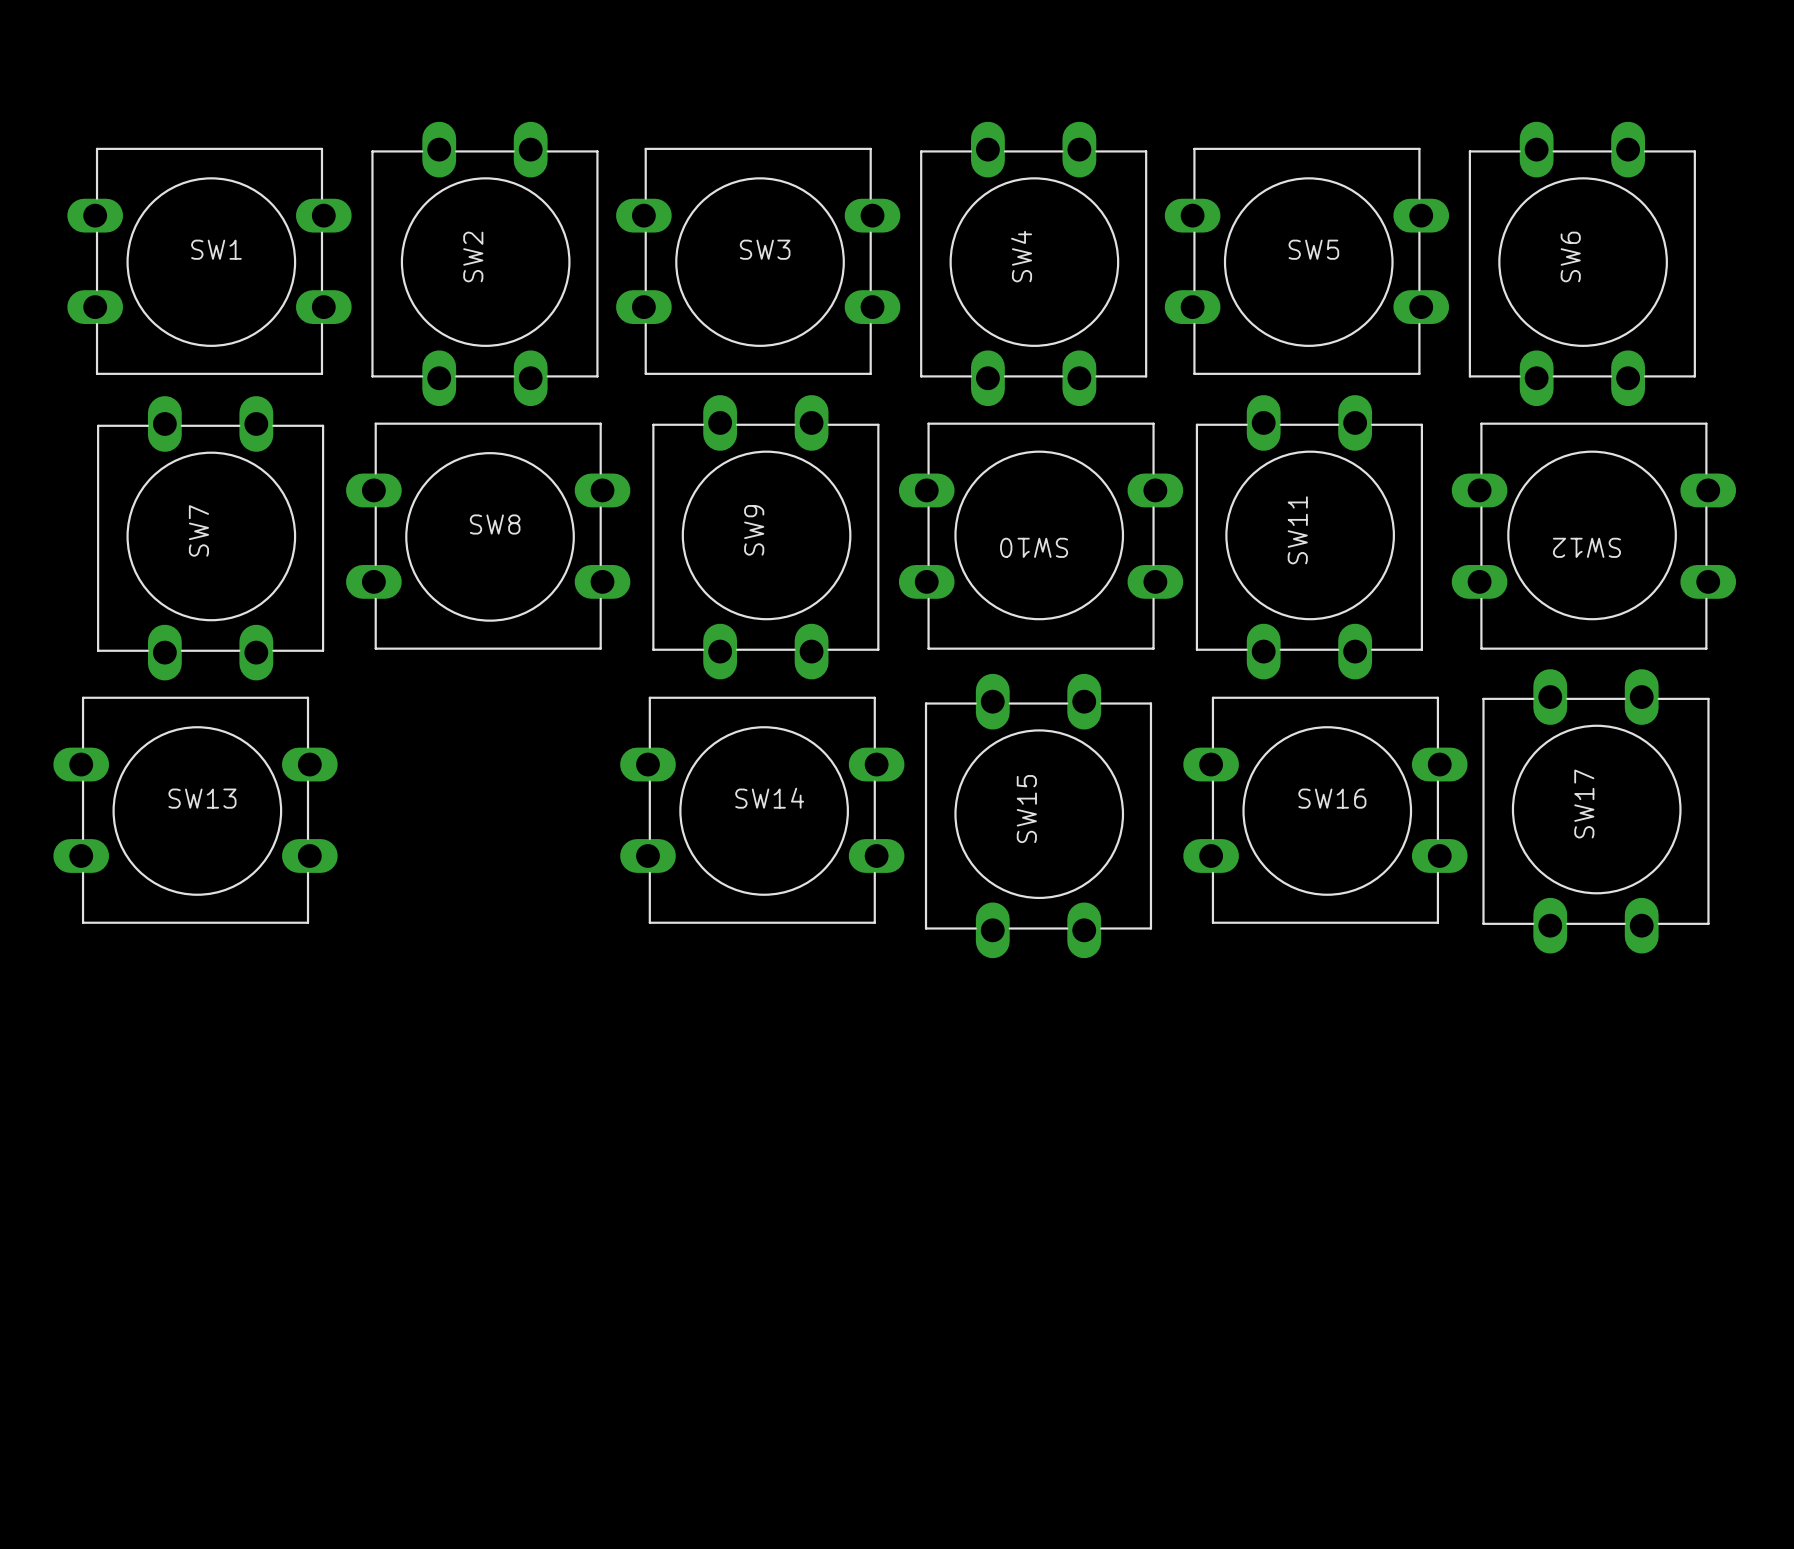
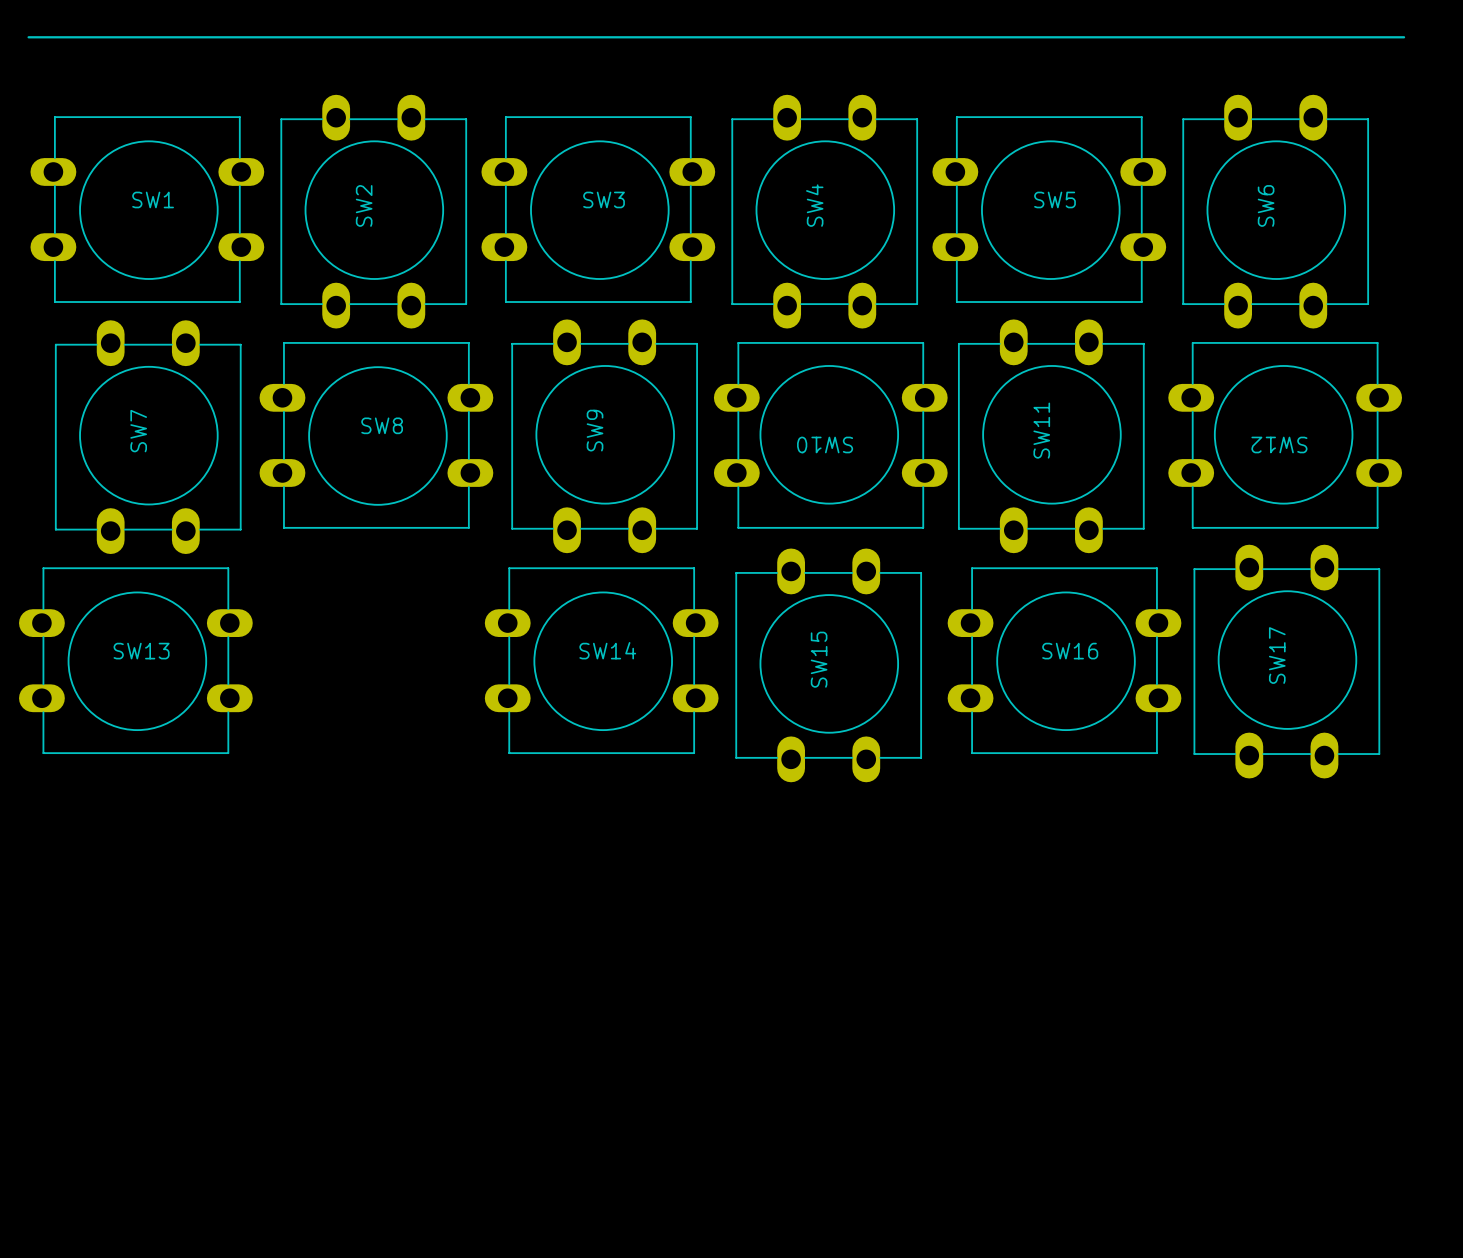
line: none -> (28, 37) (1404, 37)

